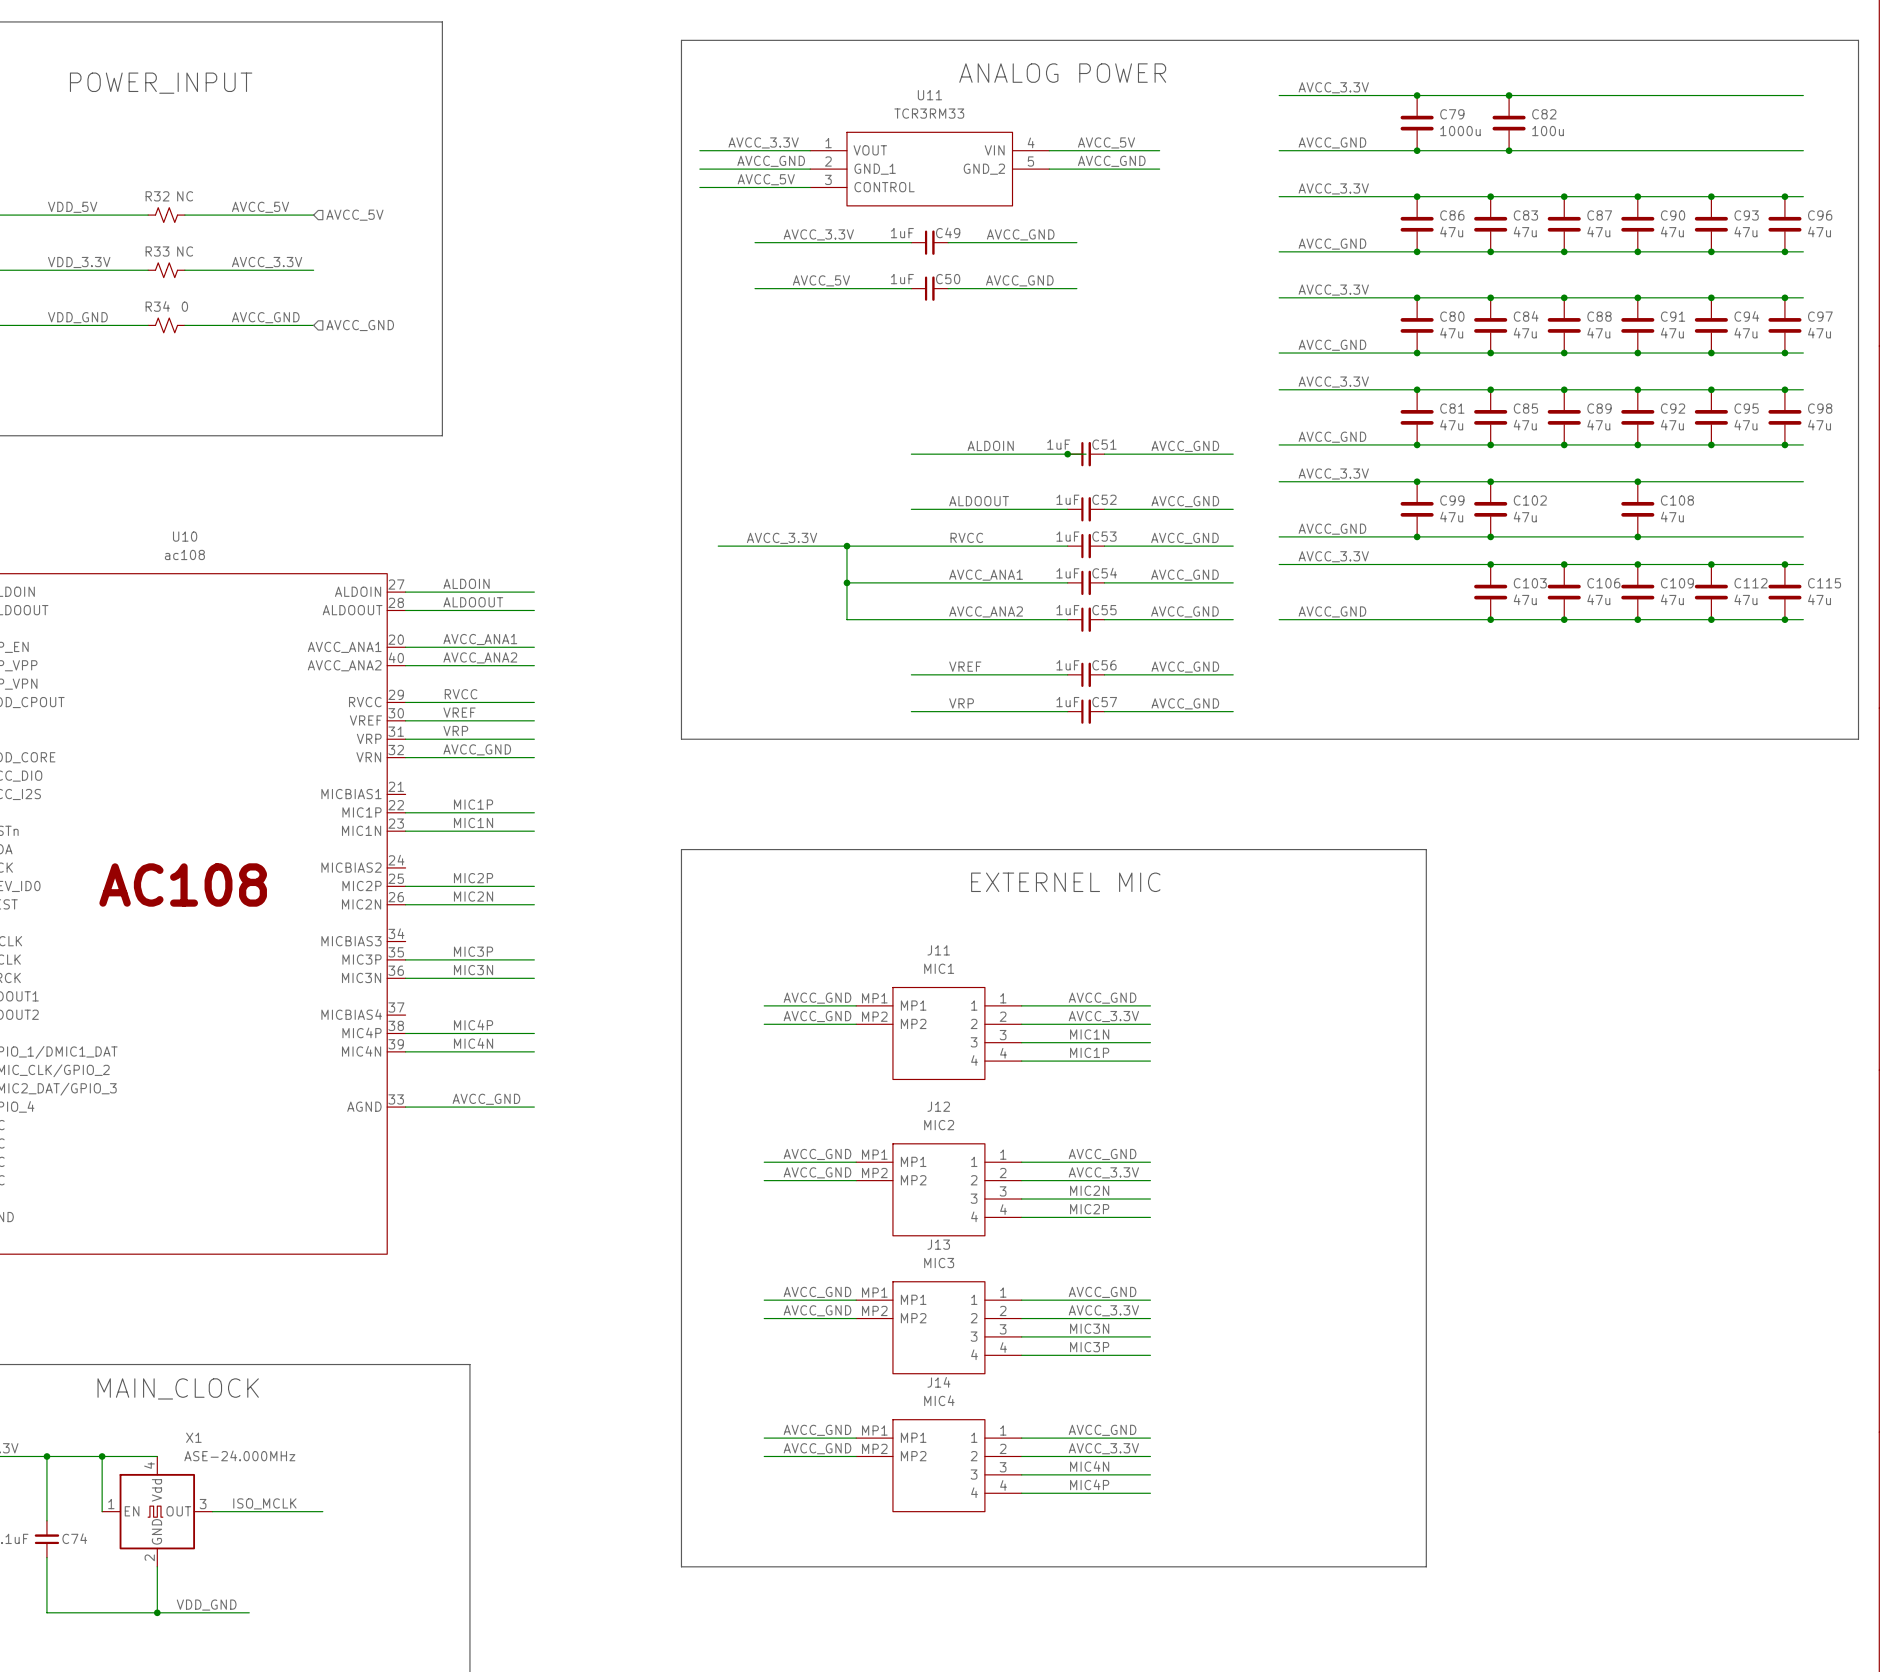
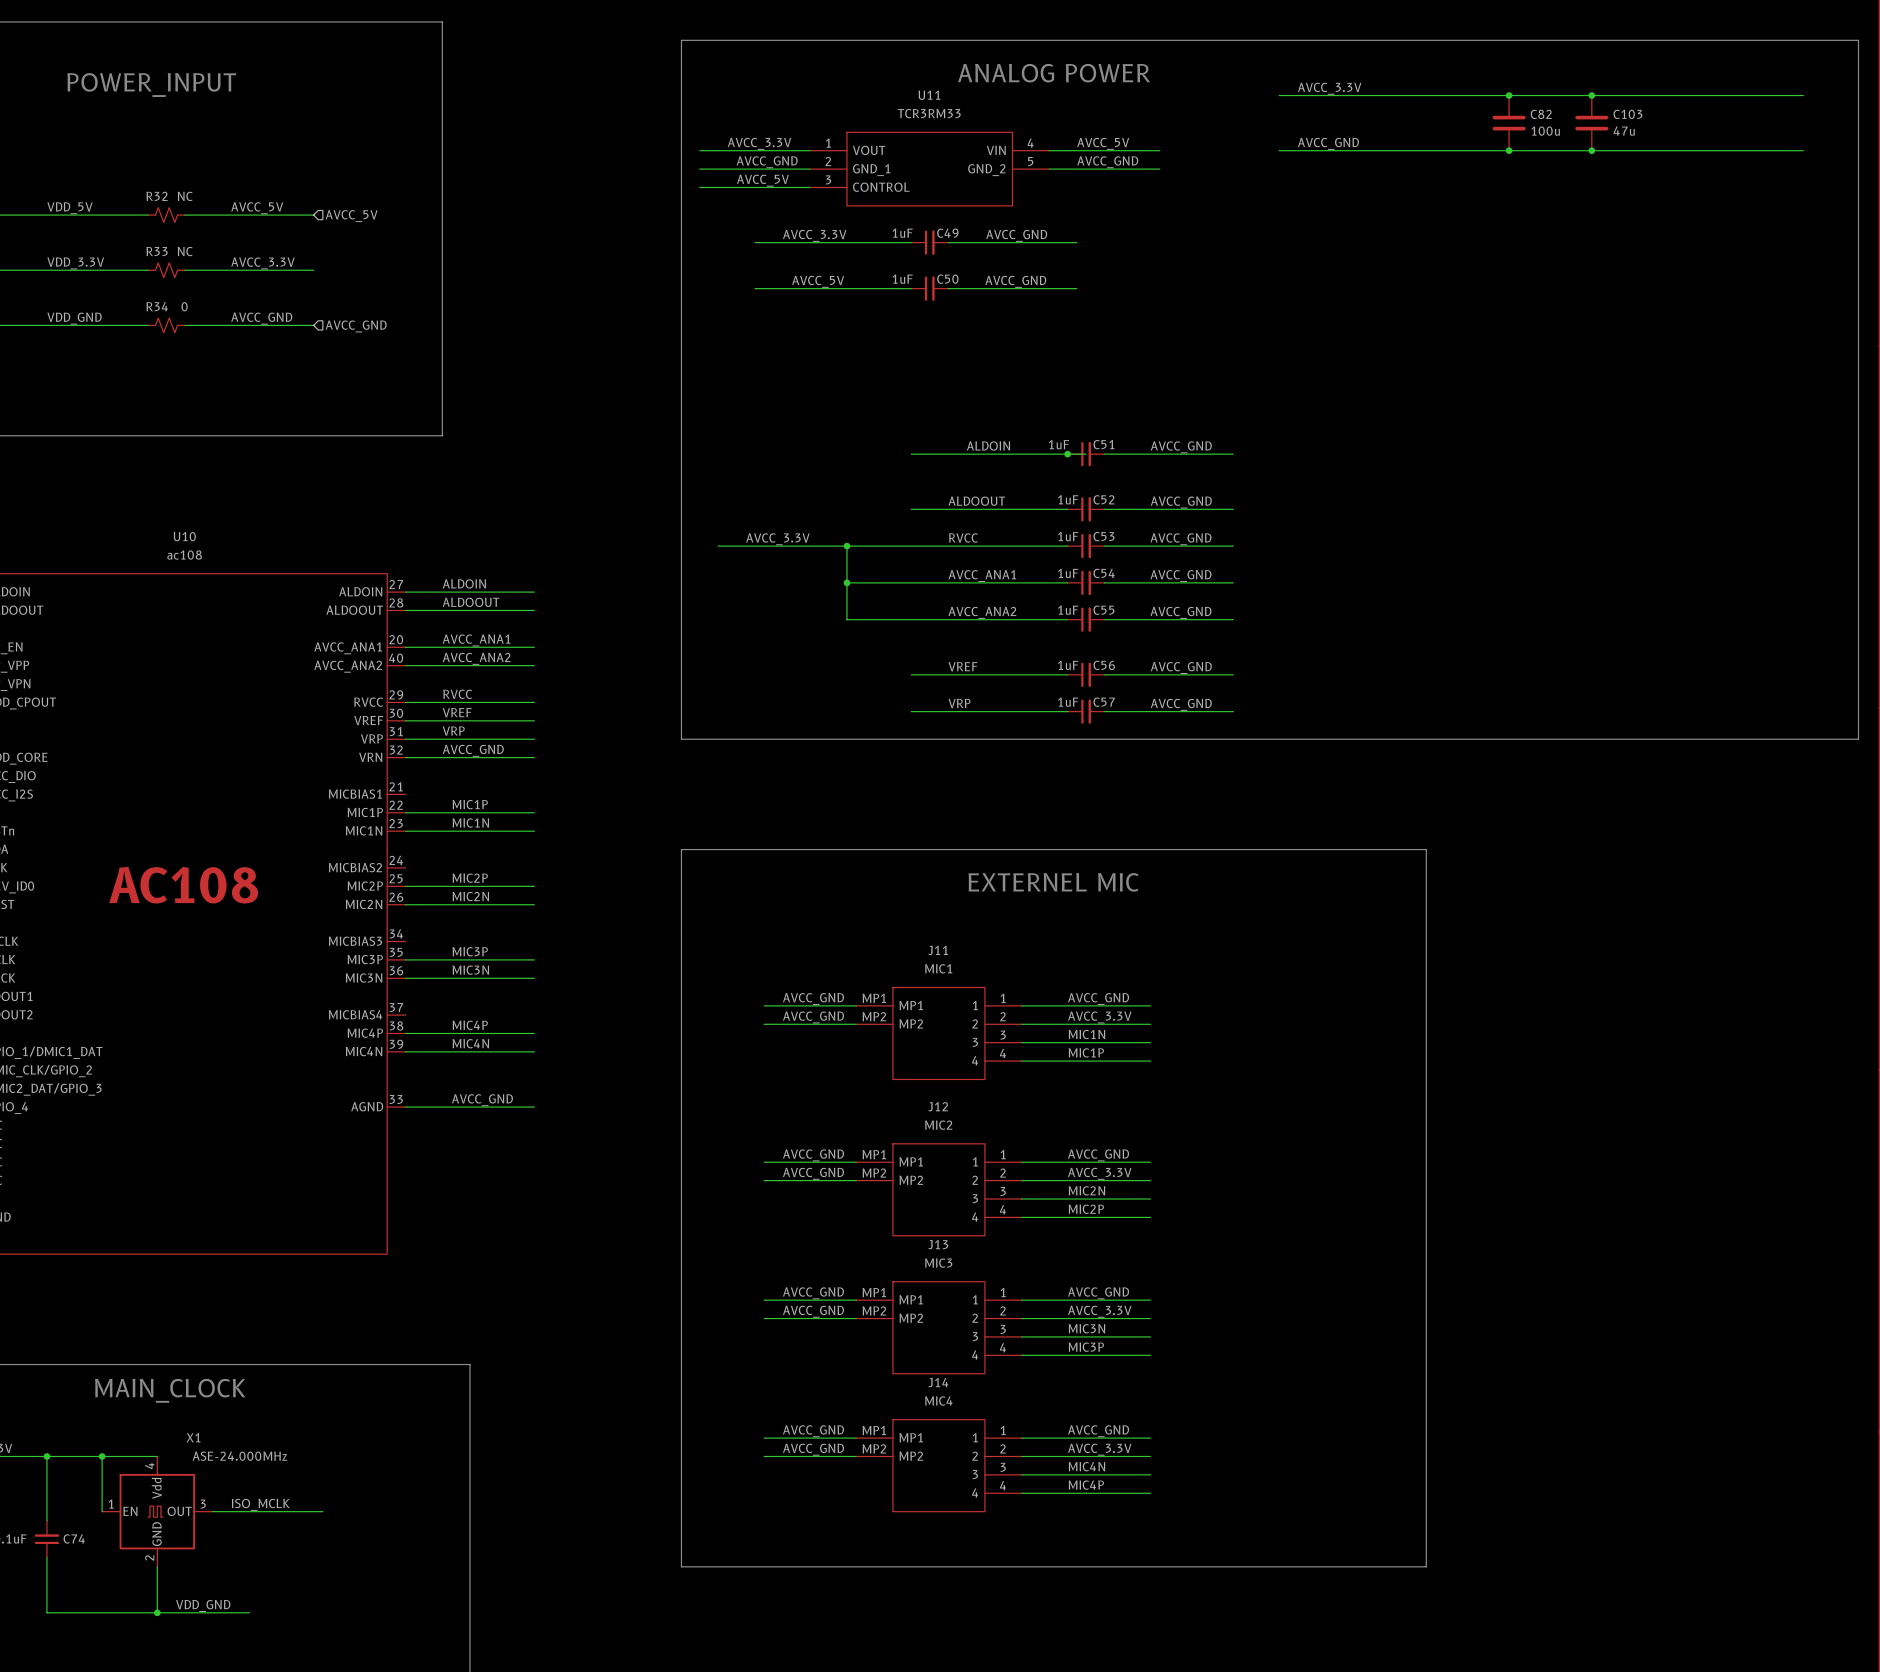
junction: (1417, 95) -> none
junction: none -> (1591, 95)
C79: 1000u (1417, 123) -> none
junction: (1417, 150) -> none
junction: none -> (1591, 150)
label: AVCC_3.3V (1333, 188) -> none
wire: (1279, 196) (1803, 196) -> none
junction: (1417, 196) -> none
junction: (1490, 196) -> none
junction: (1564, 196) -> none
junction: (1637, 196) -> none
junction: (1711, 196) -> none
junction: (1784, 196) -> none
C86: 47u (1417, 224) -> none
C83: 47u (1490, 224) -> none
C87: 47u (1564, 224) -> none
C90: 47u (1637, 224) -> none
C93: 47u (1711, 224) -> none
C96: 47u (1784, 224) -> none
label: AVCC_GND (1332, 244) -> none
wire: (1279, 251) (1803, 251) -> none
junction: (1417, 251) -> none
junction: (1490, 251) -> none
junction: (1564, 251) -> none
junction: (1637, 251) -> none
junction: (1711, 251) -> none
junction: (1784, 251) -> none
label: AVCC_3.3V (1333, 290) -> none
wire: (1279, 297) (1803, 297) -> none
junction: (1417, 297) -> none
junction: (1490, 297) -> none
junction: (1564, 297) -> none
junction: (1637, 297) -> none
junction: (1711, 297) -> none
junction: (1784, 297) -> none
C80: 47u (1417, 325) -> none
C84: 47u (1490, 325) -> none
C88: 47u (1564, 325) -> none
C91: 47u (1637, 325) -> none
C94: 47u (1711, 325) -> none
C97: 47u (1784, 325) -> none
label: AVCC_GND (1332, 345) -> none
wire: (1279, 353) (1803, 353) -> none
junction: (1417, 353) -> none
junction: (1490, 353) -> none
junction: (1564, 353) -> none
junction: (1637, 353) -> none
junction: (1711, 353) -> none
junction: (1784, 353) -> none
label: AVCC_3.3V (1333, 382) -> none
wire: (1279, 389) (1803, 389) -> none
junction: (1417, 389) -> none
junction: (1490, 389) -> none
junction: (1564, 389) -> none
junction: (1637, 389) -> none
junction: (1711, 389) -> none
junction: (1784, 389) -> none
C81: 47u (1417, 417) -> none
C85: 47u (1490, 417) -> none
C89: 47u (1564, 417) -> none
C92: 47u (1637, 417) -> none
C95: 47u (1711, 417) -> none
C98: 47u (1784, 417) -> none
label: AVCC_GND (1332, 437) -> none
wire: (1279, 444) (1803, 444) -> none
junction: (1417, 444) -> none
junction: (1490, 444) -> none
junction: (1564, 444) -> none
junction: (1637, 444) -> none
junction: (1711, 444) -> none
junction: (1784, 444) -> none
label: AVCC_3.3V (1333, 473) -> none
wire: (1279, 481) (1803, 481) -> none
junction: (1417, 481) -> none
junction: (1490, 481) -> none
junction: (1637, 481) -> none
C99: 47u (1417, 509) -> none
C102: 47u (1490, 509) -> none
C108: 47u (1637, 509) -> none
label: AVCC_GND (1332, 529) -> none
wire: (1279, 536) (1803, 536) -> none
junction: (1417, 536) -> none
junction: (1490, 536) -> none
junction: (1637, 536) -> none
label: AVCC_3.3V (1333, 556) -> none
wire: (1279, 564) (1803, 564) -> none
junction: (1490, 564) -> none
junction: (1564, 564) -> none
junction: (1637, 564) -> none
junction: (1711, 564) -> none
junction: (1784, 564) -> none
C103 position: (1490, 592) -> (1591, 123)
C106: 47u (1564, 592) -> none
C109: 47u (1637, 592) -> none
C112: 47u (1711, 592) -> none
C115: 47u (1784, 592) -> none
label: AVCC_GND (1332, 611) -> none
wire: (1279, 619) (1803, 619) -> none
junction: (1490, 619) -> none
junction: (1564, 619) -> none
junction: (1637, 619) -> none
junction: (1711, 619) -> none
junction: (1784, 619) -> none

